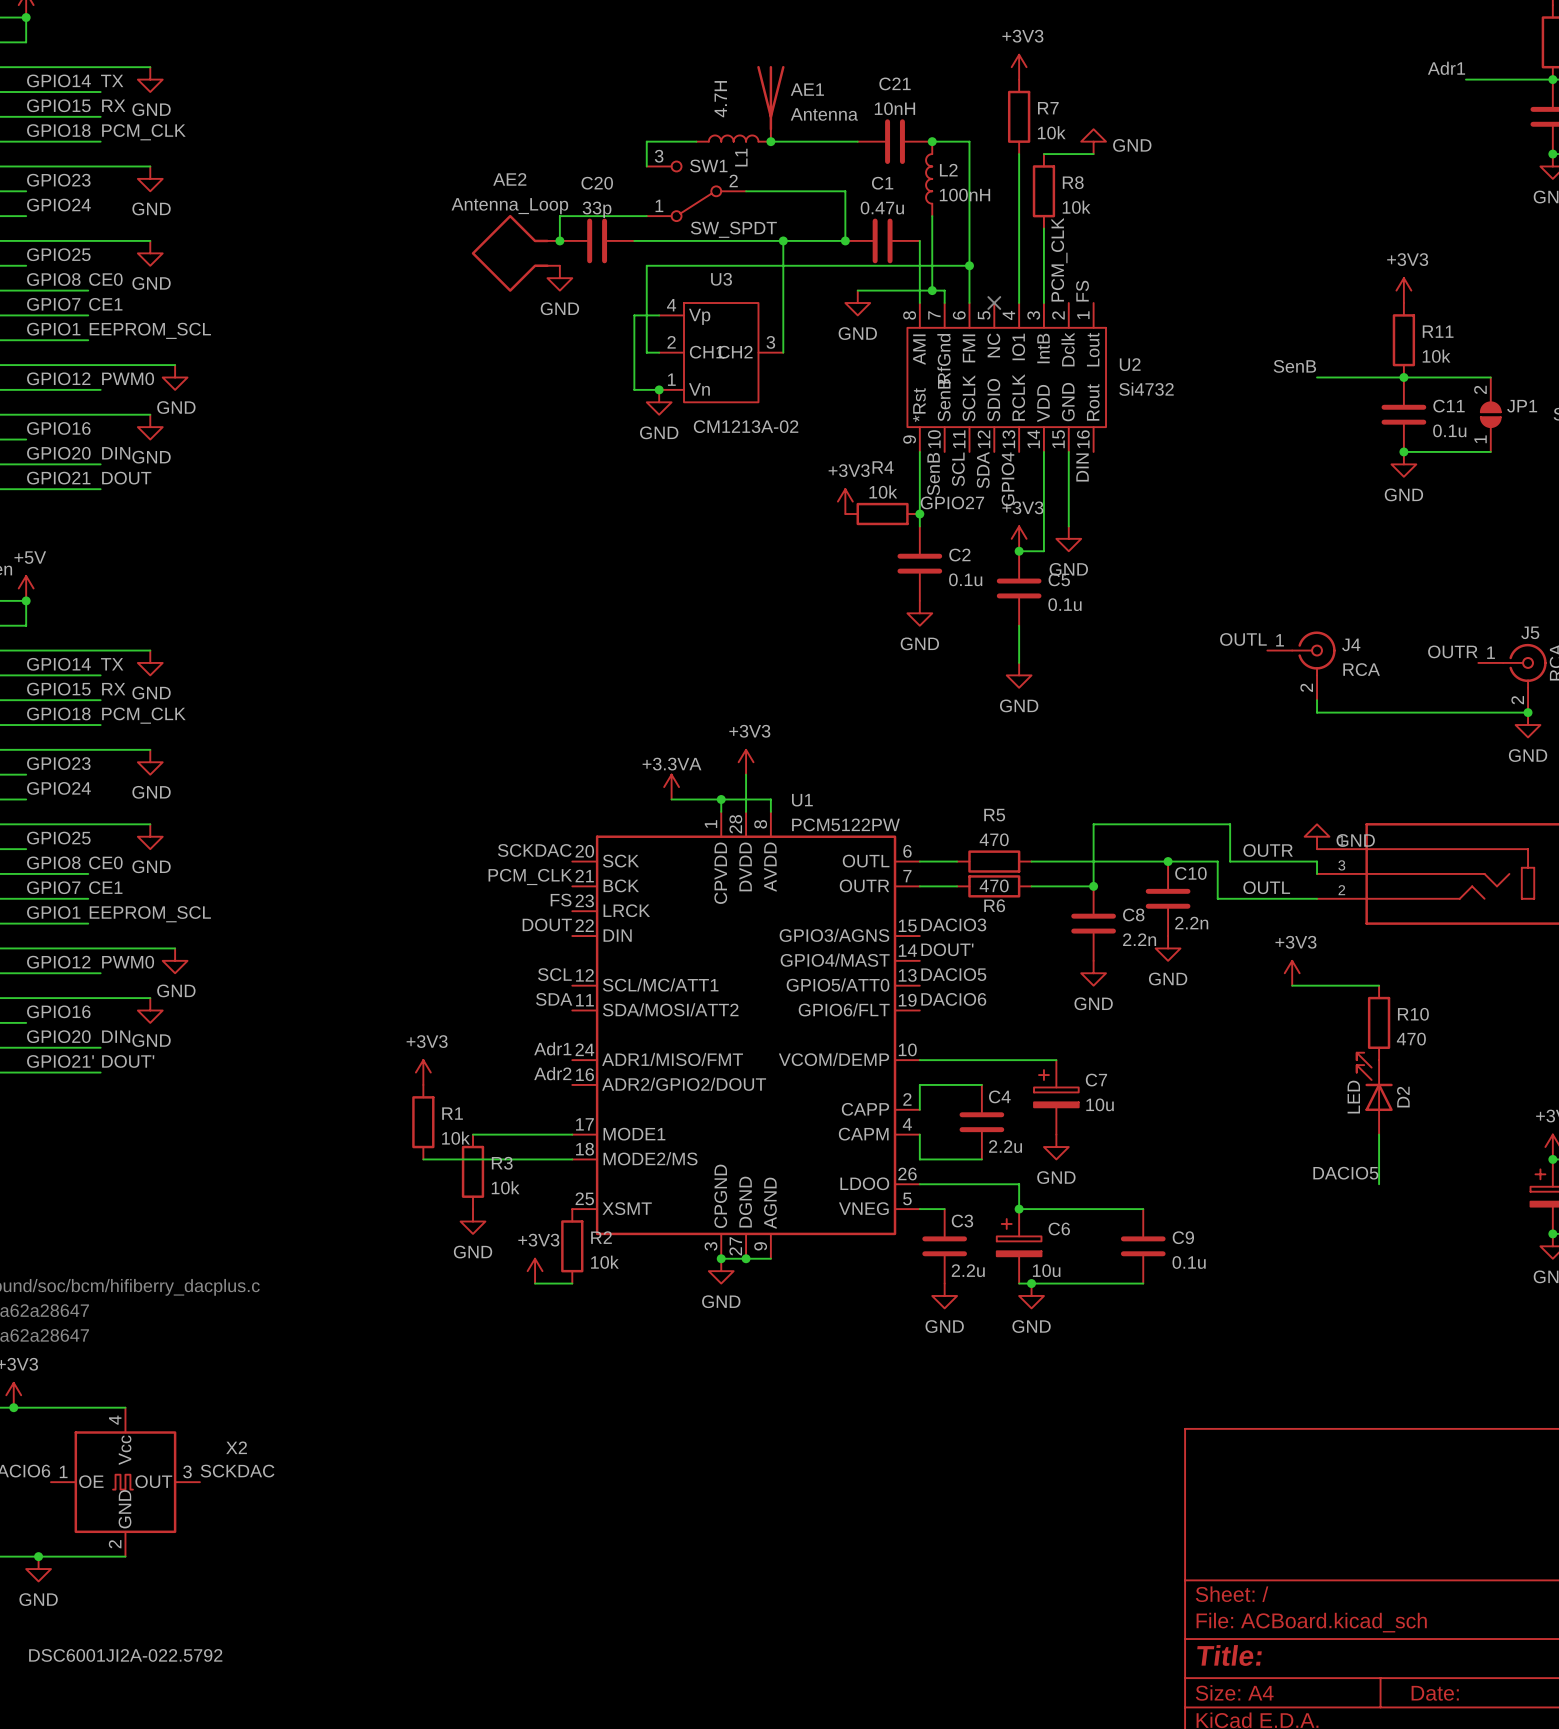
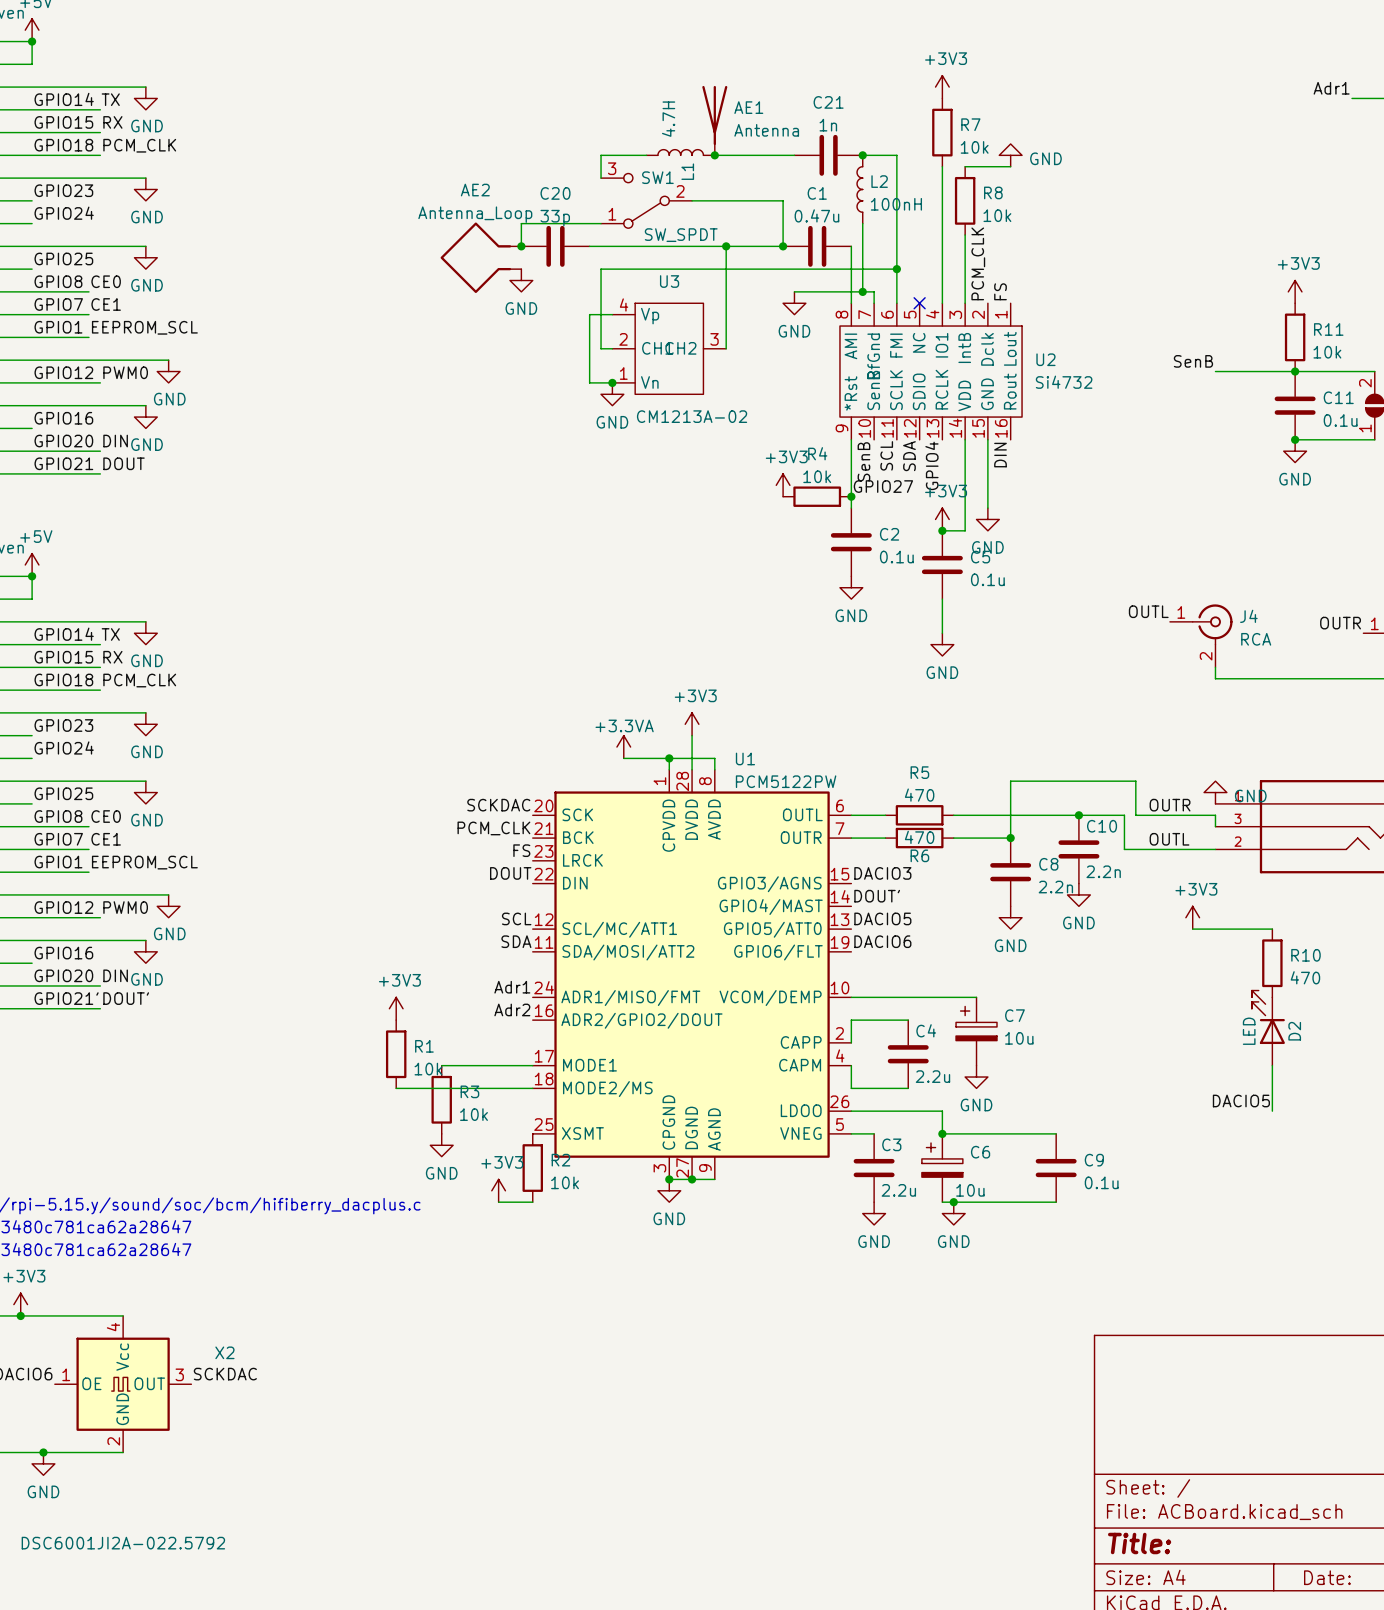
C21 value: 10nH (894, 108) -> 1n (828, 125)

